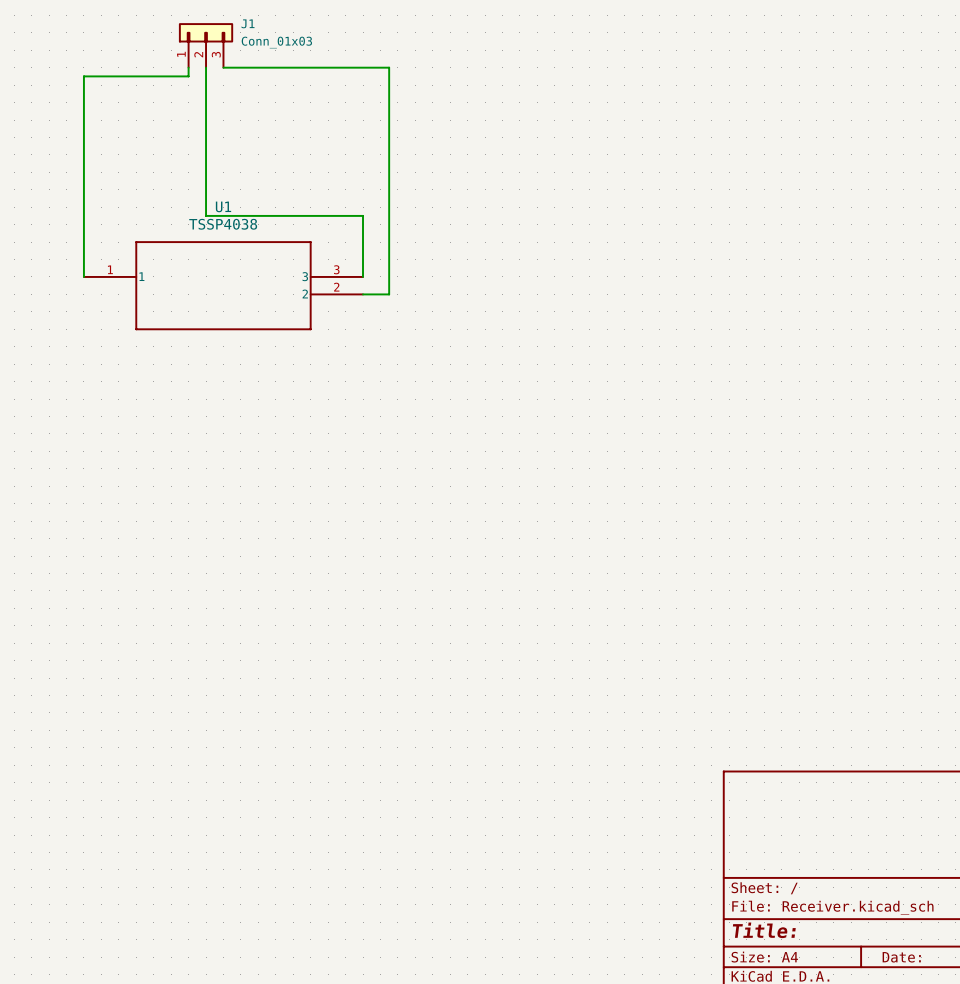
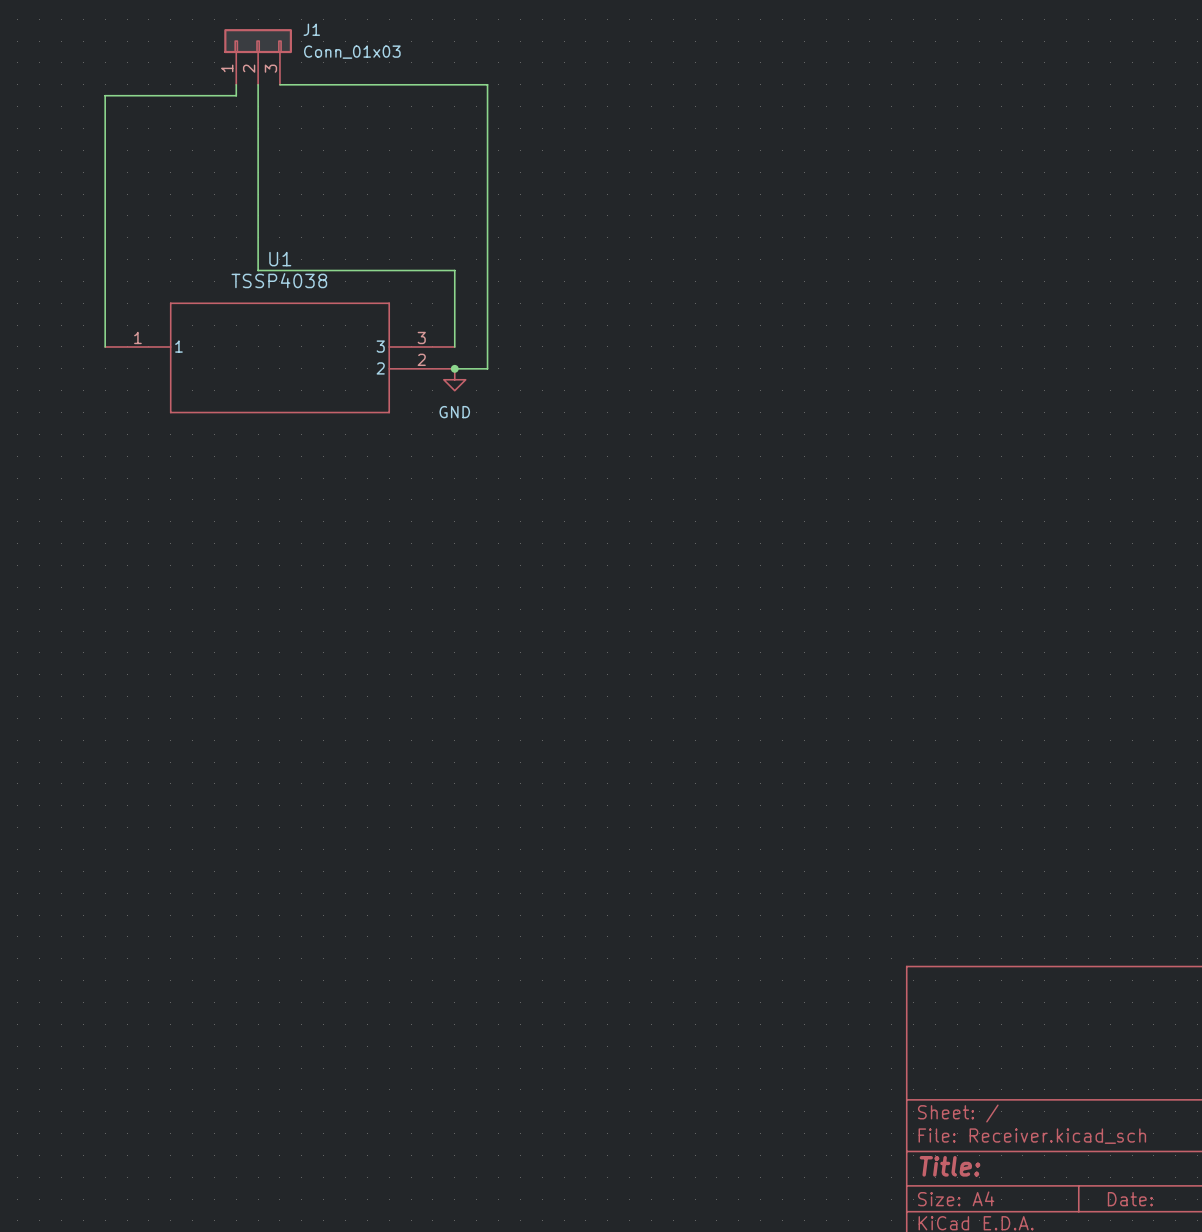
junction: none -> (454, 368)
power symbol: none -> GND (454, 379)

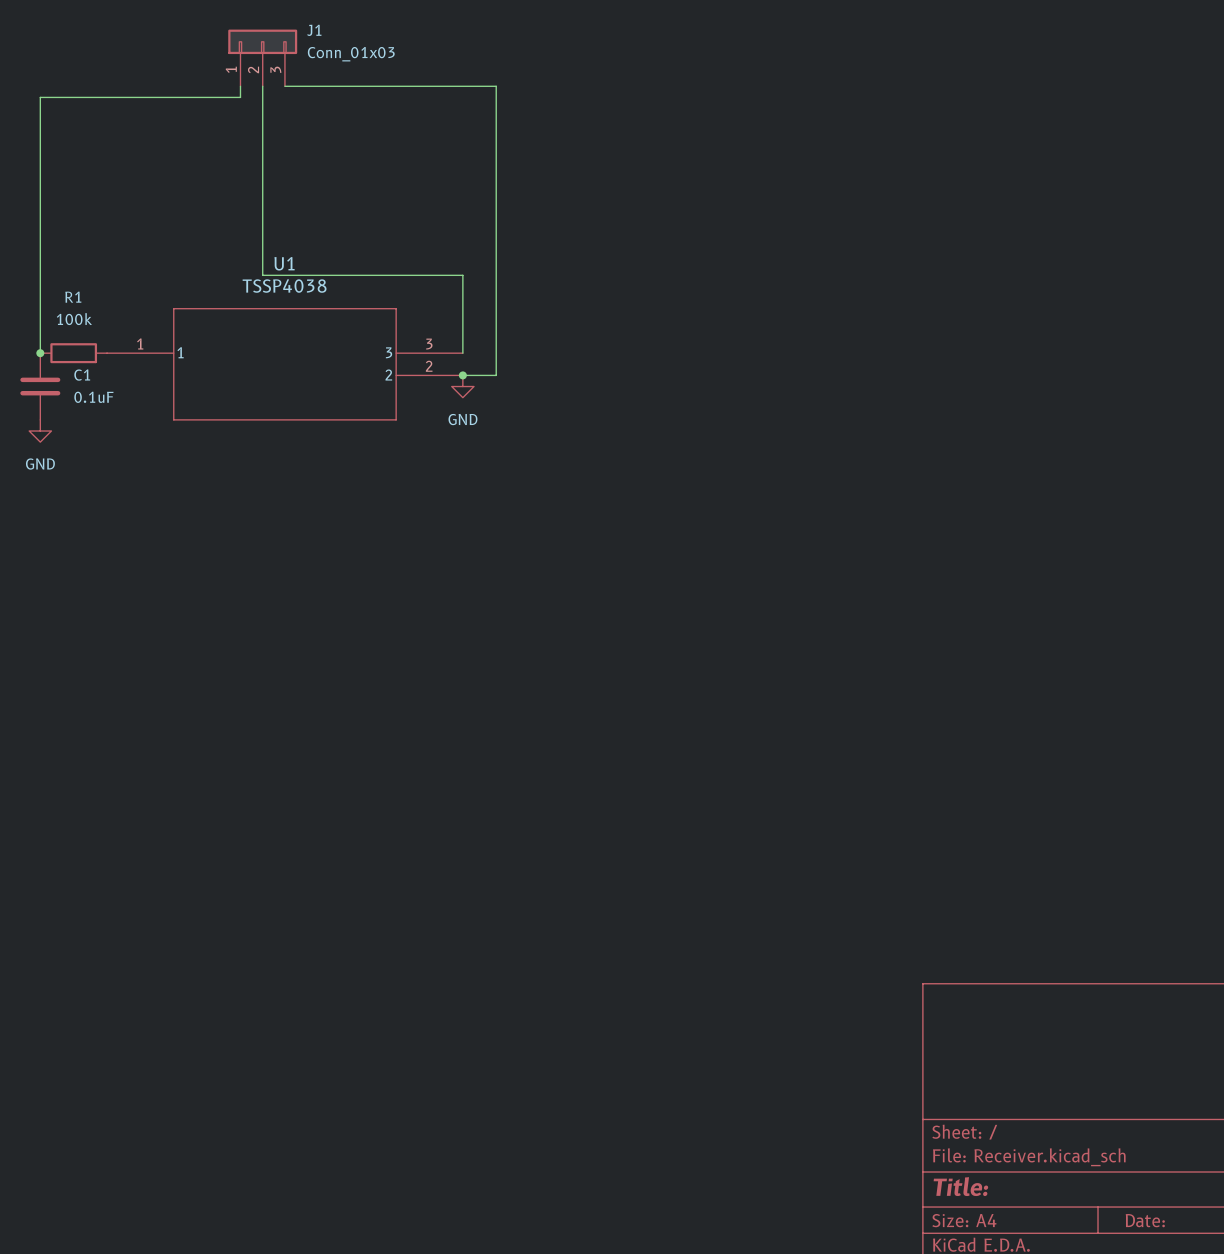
wire: (105, 95) (105, 346) -> (107, 97) (40, 97) (40, 353)
junction: none -> (40, 353)
R1: none -> 100k (73, 353)
C1: none -> 0.1uF (40, 386)
power symbol: none -> GND (40, 431)

